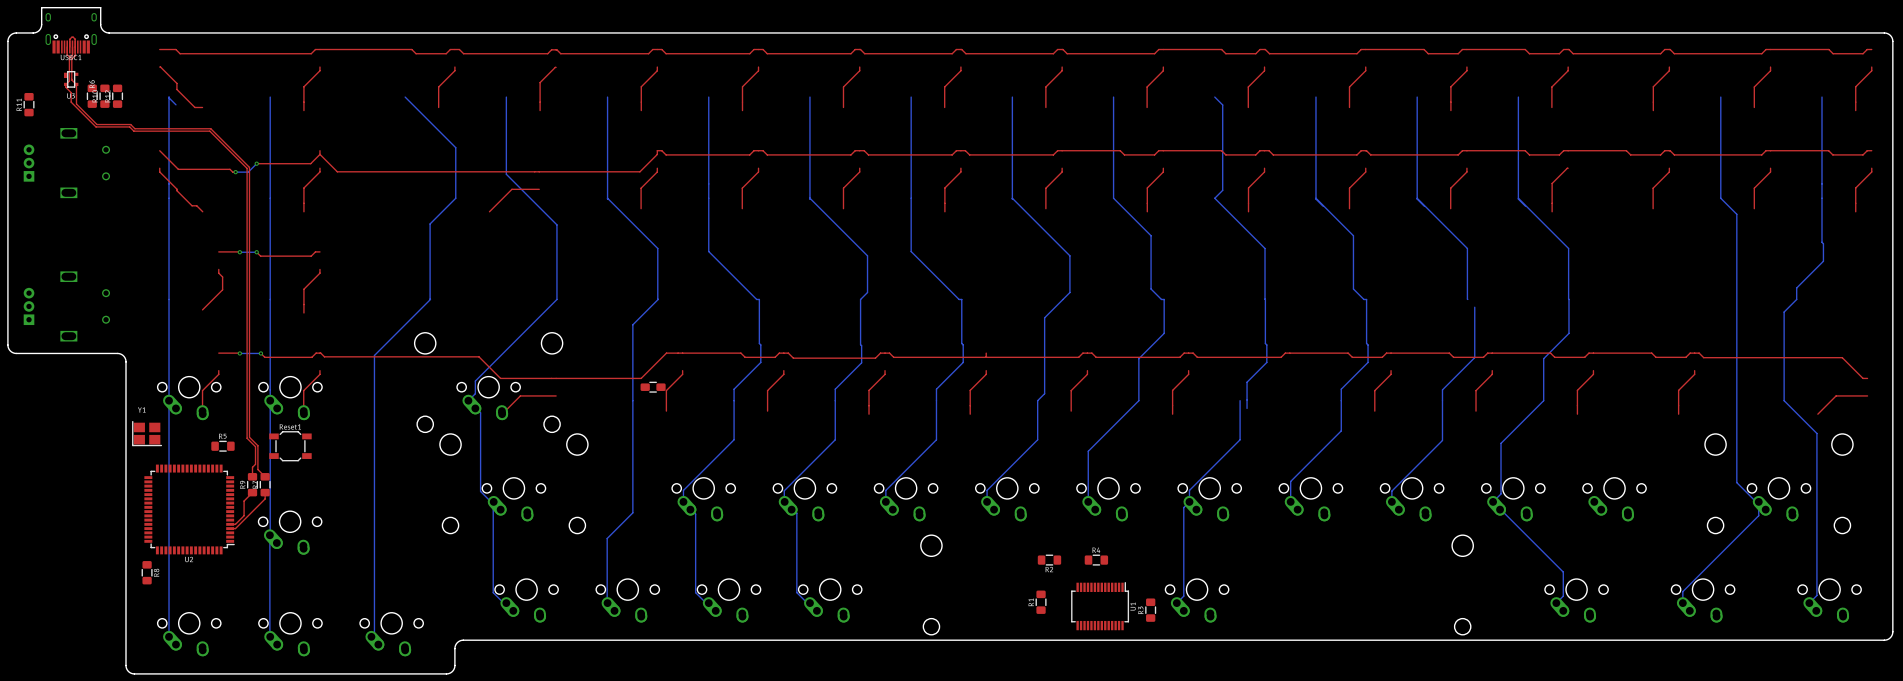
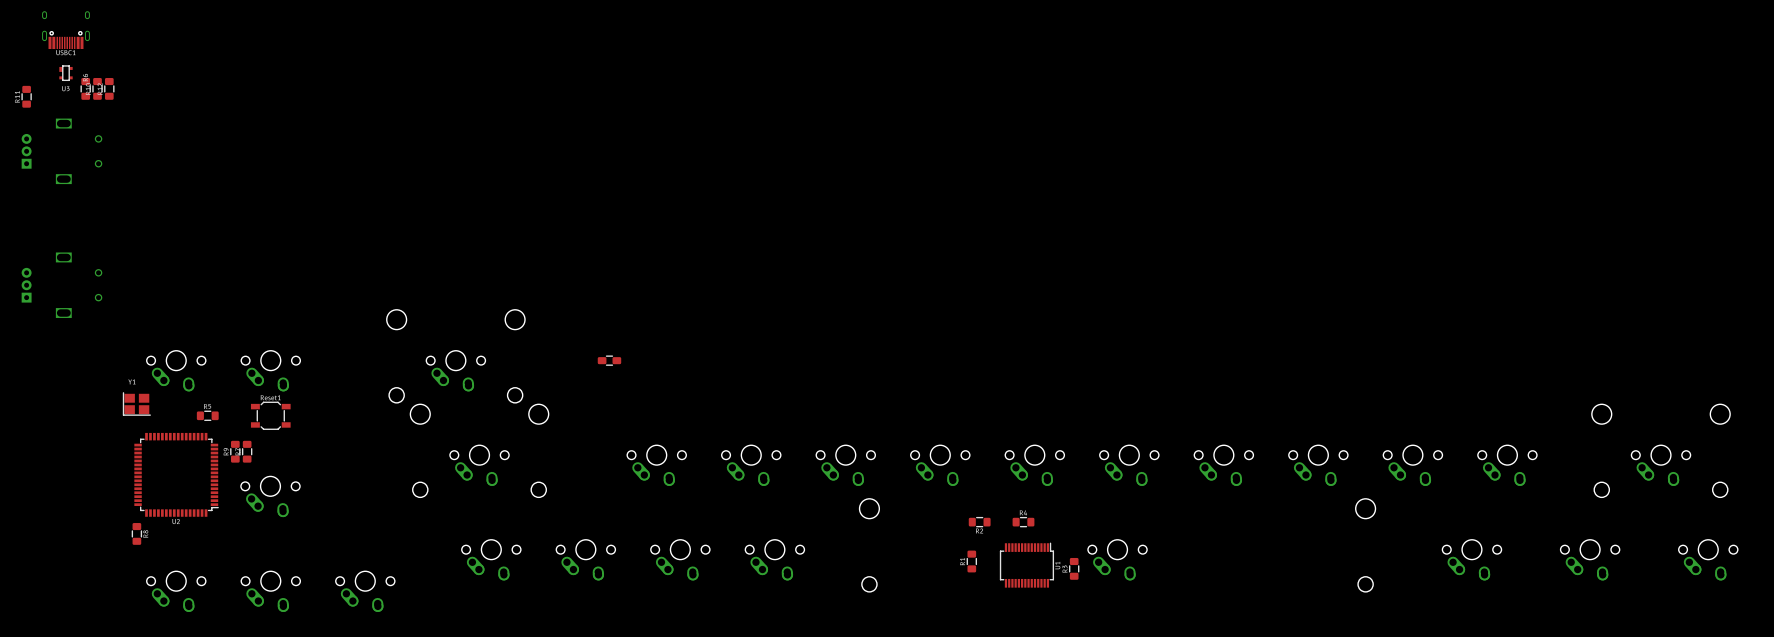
board edge: (41, 7) (100, 7) (100, 26) (104, 31) (109, 32) (1886, 33) (1891, 36) (1892, 41) (1892, 633) (1889, 638) (1884, 640) (463, 640) (455, 645) (454, 667) (447, 673) (132, 673) (127, 670) (126, 665) (125, 358) (117, 353) (15, 353) (10, 350) (8, 346) (8, 40) (14, 33) (34, 32) (39, 30) (41, 25) (41, 7) -> none
top track: (67, 47) (67, 54) (69, 57) -> none
top track: (69, 47) (69, 39) (73, 37) (75, 39) (75, 55) -> none
top track: (72, 47) (72, 54) (69, 57) (69, 81) (65, 87) (71, 92) (71, 102) (95, 126) (129, 126) (133, 131) (209, 131) (247, 168) (247, 438) (255, 446) (255, 464) (252, 467) (252, 476) -> none
top track: (159, 49) (175, 49) (180, 53) (311, 53) (315, 49) (411, 49) (416, 53) (446, 53) (450, 49) (459, 49) (463, 53) (547, 53) (551, 49) (556, 49) (560, 53) (648, 53) (652, 49) (661, 49) (666, 53) (749, 53) (754, 49) (763, 49) (767, 53) (850, 53) (855, 49) (860, 49) (864, 53) (952, 53) (956, 49) (961, 49) (965, 53) (1053, 53) (1057, 49) (1062, 49) (1067, 53) (1154, 53) (1158, 49) (1221, 49) (1225, 53) (1255, 53) (1260, 49) (1265, 49) (1269, 53) (1357, 53) (1361, 49) (1424, 49) (1428, 53) (1458, 53) (1462, 49) (1525, 49) (1529, 53) (1559, 53) (1563, 49) (1568, 49) (1573, 53) (1660, 53) (1664, 49) (1670, 49) (1674, 53) (1761, 53) (1766, 49) (1828, 49) (1833, 53) (1863, 53) (1867, 49) (1871, 49) -> none
top track: (75, 55) (71, 58) (71, 79) (76, 84) (76, 104) (96, 124) (130, 124) (134, 128) (210, 128) (249, 167) (249, 437) (257, 445) (257, 469) (265, 476) -> none
top track: (159, 67) (176, 83) (176, 89) (194, 107) (202, 107) -> none
top track: (319, 67) (319, 70) (303, 86) (303, 110) -> none
top track: (454, 67) (454, 70) (438, 87) (438, 107) -> none
top track: (556, 67) (540, 82) (540, 110) -> none
top track: (657, 67) (657, 70) (641, 86) (641, 110) -> none
top track: (758, 67) (758, 70) (742, 86) (742, 110) -> none
top track: (859, 67) (859, 70) (843, 87) (843, 107) -> none
top track: (960, 67) (960, 70) (944, 87) (944, 107) -> none
top track: (1062, 67) (1062, 70) (1045, 87) (1045, 107) -> none
top track: (1163, 67) (1163, 70) (1147, 87) (1147, 107) -> none
top track: (1264, 67) (1264, 70) (1248, 87) (1248, 107) -> none
top track: (1365, 67) (1365, 70) (1349, 87) (1349, 107) -> none
top track: (1466, 67) (1466, 70) (1450, 86) (1450, 110) -> none
top track: (1568, 67) (1568, 70) (1551, 87) (1551, 107) -> none
top track: (1669, 67) (1669, 70) (1653, 86) (1653, 110) -> none
top track: (1770, 67) (1770, 70) (1754, 87) (1754, 107) -> none
top track: (1871, 67) (1871, 70) (1855, 86) (1855, 110) -> none
bottom track: (169, 97) (169, 637) -> none
bottom track: (169, 97) (175, 104) -> none
bottom track: (270, 97) (270, 636) -> none
bottom track: (405, 97) (455, 147) (455, 198) (430, 223) (430, 299) (374, 355) (374, 633) (371, 636) -> none
bottom track: (506, 97) (506, 174) (556, 224) (556, 299) (475, 381) (475, 393) (468, 400) (480, 412) (480, 491) (491, 501) (493, 501) (493, 592) (503, 603) (506, 603) -> none
bottom track: (607, 97) (607, 199) -> none
bottom track: (708, 97) (708, 251) (756, 299) (759, 299) (760, 344) (760, 362) (734, 389) (734, 439) (683, 490) (683, 501) (695, 514) (695, 592) (706, 603) (708, 603) -> none
bottom track: (809, 97) (809, 199) -> none
bottom track: (911, 97) (911, 251) (959, 299) (961, 299) (963, 362) (936, 389) (936, 439) (885, 490) (885, 501) -> none
bottom track: (1012, 97) (1012, 199) -> none
bottom track: (1113, 97) (1113, 198) (1151, 235) (1151, 289) (1161, 299) (1164, 299) (1164, 333) (1138, 358) (1138, 400) (1088, 451) (1088, 501) -> none
bottom track: (1214, 97) (1222, 104) (1222, 190) (1214, 198) (1265, 248) (1266, 362) (1247, 382) (1247, 408) -> none
bottom track: (1315, 97) (1315, 199) (1322, 206) -> none
bottom track: (1417, 97) (1417, 199) (1424, 206) -> none
bottom track: (1518, 97) (1518, 199) (1525, 206) -> none
bottom track: (1720, 97) (1720, 198) (1736, 214) (1736, 482) (1756, 501) (1758, 501) (1758, 515) (1682, 591) (1682, 603) -> none
bottom track: (1821, 97) (1823, 261) (1796, 287) (1796, 299) (1784, 312) (1784, 400) (1816, 433) (1816, 595) (1809, 603) -> none
top track: (159, 150) (178, 169) (229, 169) (235, 172) -> none
top track: (319, 150) (319, 154) -> none
top track: (1871, 150) (1867, 150) (1863, 154) (1832, 154) (1828, 150) (1766, 150) (1761, 154) (1674, 154) (1670, 150) (1664, 150) (1660, 154) (1630, 154) (1626, 150) (1563, 150) (1559, 154) (1529, 154) (1525, 150) (1462, 150) (1458, 154) (1370, 154) (1366, 150) (1361, 150) (1357, 154) (1273, 154) (1269, 150) (1260, 150) (1255, 154) (1225, 154) (1221, 150) (1158, 150) (1154, 154) (1124, 154) (1120, 150) (1057, 150) (1053, 154) (969, 154) (965, 150) (956, 150) (952, 154) (868, 154) (864, 150) (855, 150) (850, 154) (767, 154) (763, 150) (754, 150) (749, 154) (666, 154) (661, 150) (657, 150) (657, 154) (639, 171) (337, 171) (319, 154) -> none
top track: (319, 154) (310, 163) (256, 163) -> none
bottom track: (256, 163) (248, 172) (235, 172) -> none
via: (256, 163) -> none
top track: (159, 168) (159, 171) (176, 190) (192, 205) (196, 205) (202, 211) -> none
top track: (319, 168) (319, 171) (303, 187) (303, 211) -> none
top track: (657, 168) (657, 171) (641, 188) (641, 208) -> none
top track: (758, 168) (758, 171) (742, 188) (742, 208) -> none
top track: (859, 168) (859, 171) (843, 188) (843, 208) -> none
top track: (960, 168) (960, 171) (944, 187) (944, 211) -> none
top track: (1062, 168) (1062, 171) (1045, 188) (1045, 208) -> none
top track: (1163, 168) (1163, 171) (1147, 187) (1147, 211) -> none
top track: (1264, 168) (1264, 171) (1248, 187) (1248, 211) -> none
top track: (1365, 168) (1365, 171) (1349, 188) (1349, 208) -> none
top track: (1466, 168) (1466, 171) (1450, 188) (1450, 208) -> none
top track: (1568, 168) (1552, 183) (1552, 211) -> none
top track: (1669, 168) (1669, 171) (1653, 188) (1653, 208) -> none
top track: (1770, 168) (1770, 171) (1754, 188) (1754, 208) -> none
top track: (1871, 168) (1871, 171) (1855, 187) (1855, 211) -> none
via: (235, 172) -> none
top track: (539, 189) (511, 189) (489, 211) -> none
bottom track: (607, 198) (657, 248) (658, 299) (632, 324) (632, 512) (607, 538) (607, 603) -> none
bottom track: (809, 198) (867, 255) (867, 292) (860, 299) (861, 362) (835, 389) (835, 439) (784, 490) (784, 500) (796, 513) (796, 592) (807, 603) (809, 603) -> none
bottom track: (1012, 198) (1069, 255) (1069, 292) (1044, 317) (1044, 393) (1037, 400) (1037, 439) (987, 490) (987, 501) -> none
bottom track: (1315, 198) (1353, 235) (1353, 289) (1363, 299) (1366, 299) (1368, 362) (1341, 389) (1341, 430) (1290, 481) (1290, 501) -> none
bottom track: (1417, 198) (1467, 248) (1467, 299) -> none
bottom track: (1518, 198) (1568, 248) (1568, 333) (1543, 358) (1543, 400) (1501, 443) (1501, 493) (1493, 501) (1563, 572) (1563, 596) (1556, 603) -> none
top track: (218, 251) (239, 252) -> none
top track: (319, 251) (315, 251) (311, 256) (260, 256) (256, 252) -> none
bottom track: (239, 252) (256, 252) -> none
via: (239, 252) -> none
via: (256, 252) -> none
top track: (218, 269) (218, 273) (222, 277) (222, 289) (202, 309) -> none
top track: (319, 269) (319, 273) (303, 289) (303, 312) -> none
bottom track: (1474, 307) (1474, 357) (1442, 389) (1442, 440) (1391, 491) (1391, 501) -> none
top track: (218, 353) (239, 353) -> none
bottom track: (239, 353) (260, 353) -> none
via: (239, 353) -> none
top track: (260, 353) (264, 357) (311, 357) (316, 353) (320, 353) (324, 356) (478, 356) (500, 378) (641, 378) (666, 353) (740, 353) (745, 357) (775, 357) (779, 353) (788, 353) (793, 358) (875, 358) (880, 353) (889, 353) (893, 357) (986, 356) -> none
via: (260, 353) -> none
top track: (986, 353) (986, 356) -> none
top track: (986, 356) (1078, 357) (1082, 353) (1091, 353) (1096, 357) (1179, 357) (1184, 353) (1193, 353) (1197, 357) (1281, 357) (1285, 353) (1348, 353) (1352, 357) (1382, 357) (1386, 353) (1449, 353) (1453, 357) (1483, 357) (1487, 353) (1550, 353) (1554, 357) (1584, 357) (1588, 353) (1651, 353) (1655, 357) (1685, 357) (1690, 353) (1699, 353) (1703, 357) (1842, 357) (1863, 378) (1867, 378) -> none
top track: (218, 370) (218, 374) (202, 390) (202, 411) -> none
top track: (319, 370) (319, 374) (303, 390) (303, 411) -> none
top track: (682, 370) (682, 374) (666, 390) (666, 411) -> none
top track: (783, 370) (783, 374) (767, 390) (767, 411) -> none
top track: (885, 370) (885, 374) (869, 390) (869, 414) -> none
top track: (986, 370) (986, 374) (970, 390) (970, 414) -> none
top track: (1087, 370) (1087, 374) (1071, 390) (1071, 411) -> none
top track: (1188, 370) (1188, 374) (1172, 390) (1172, 414) -> none
top track: (1391, 370) (1391, 374) (1374, 390) (1374, 411) -> none
top track: (1492, 370) (1492, 374) (1476, 390) (1476, 411) -> none
top track: (1593, 370) (1593, 374) (1577, 390) (1577, 414) -> none
top track: (1694, 370) (1694, 374) (1678, 390) (1678, 414) -> none
top track: (556, 395) (520, 395) (505, 411) (501, 411) -> none
top track: (1867, 395) (1836, 395) (1817, 414) -> none
bottom track: (1240, 400) (1240, 439) (1189, 490) (1189, 501) (1183, 507) (1183, 596) (1176, 603) -> none
top track: (252, 492) (244, 501) (244, 515) (235, 524) (230, 524) -> none
top track: (265, 492) (265, 498) (235, 528) (230, 528) -> none

